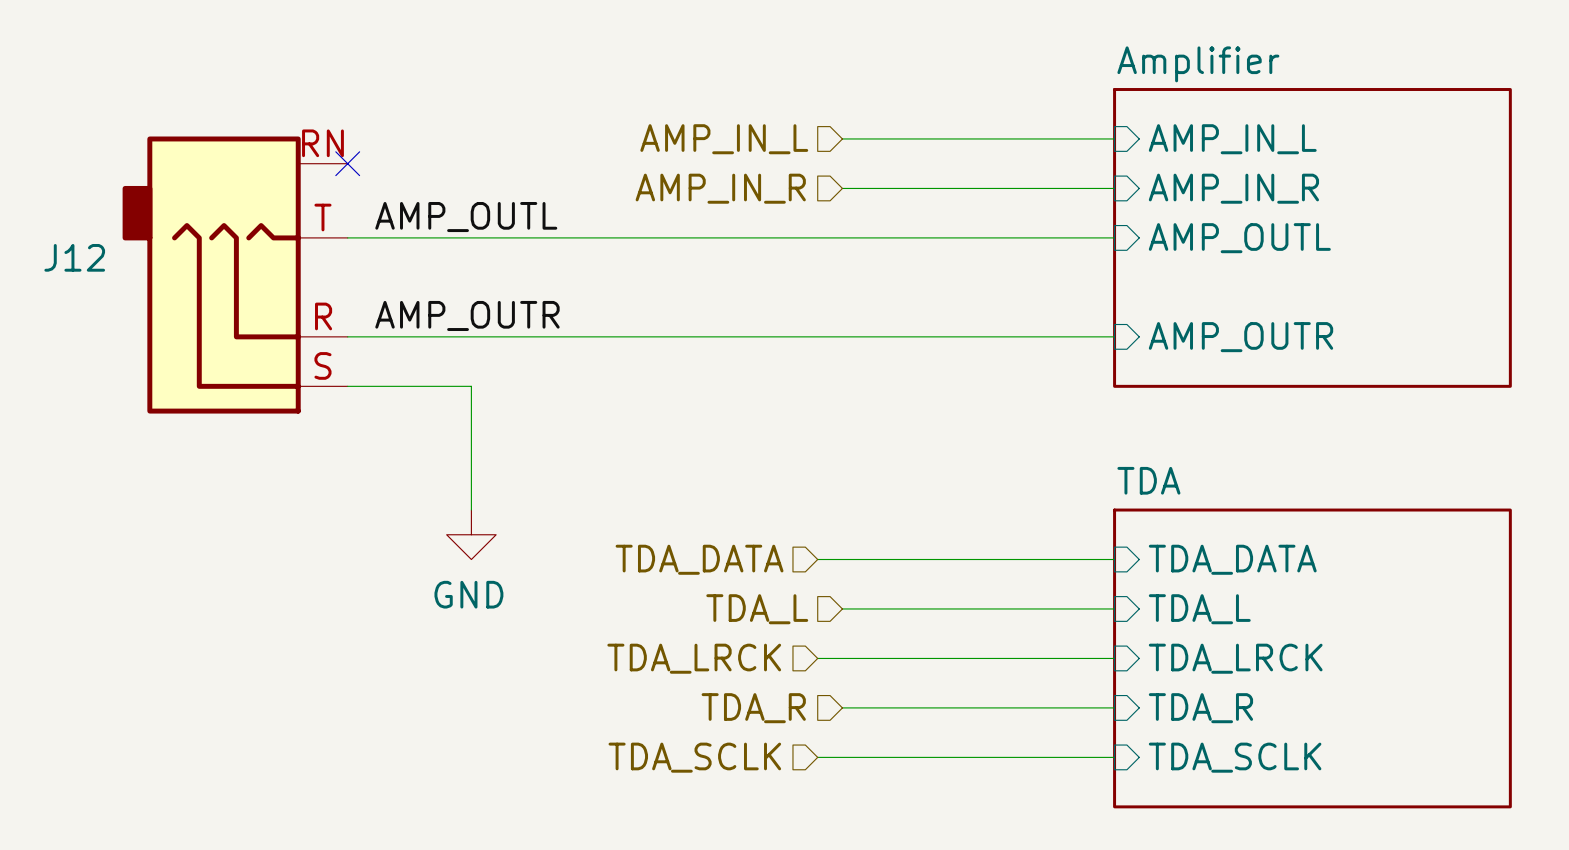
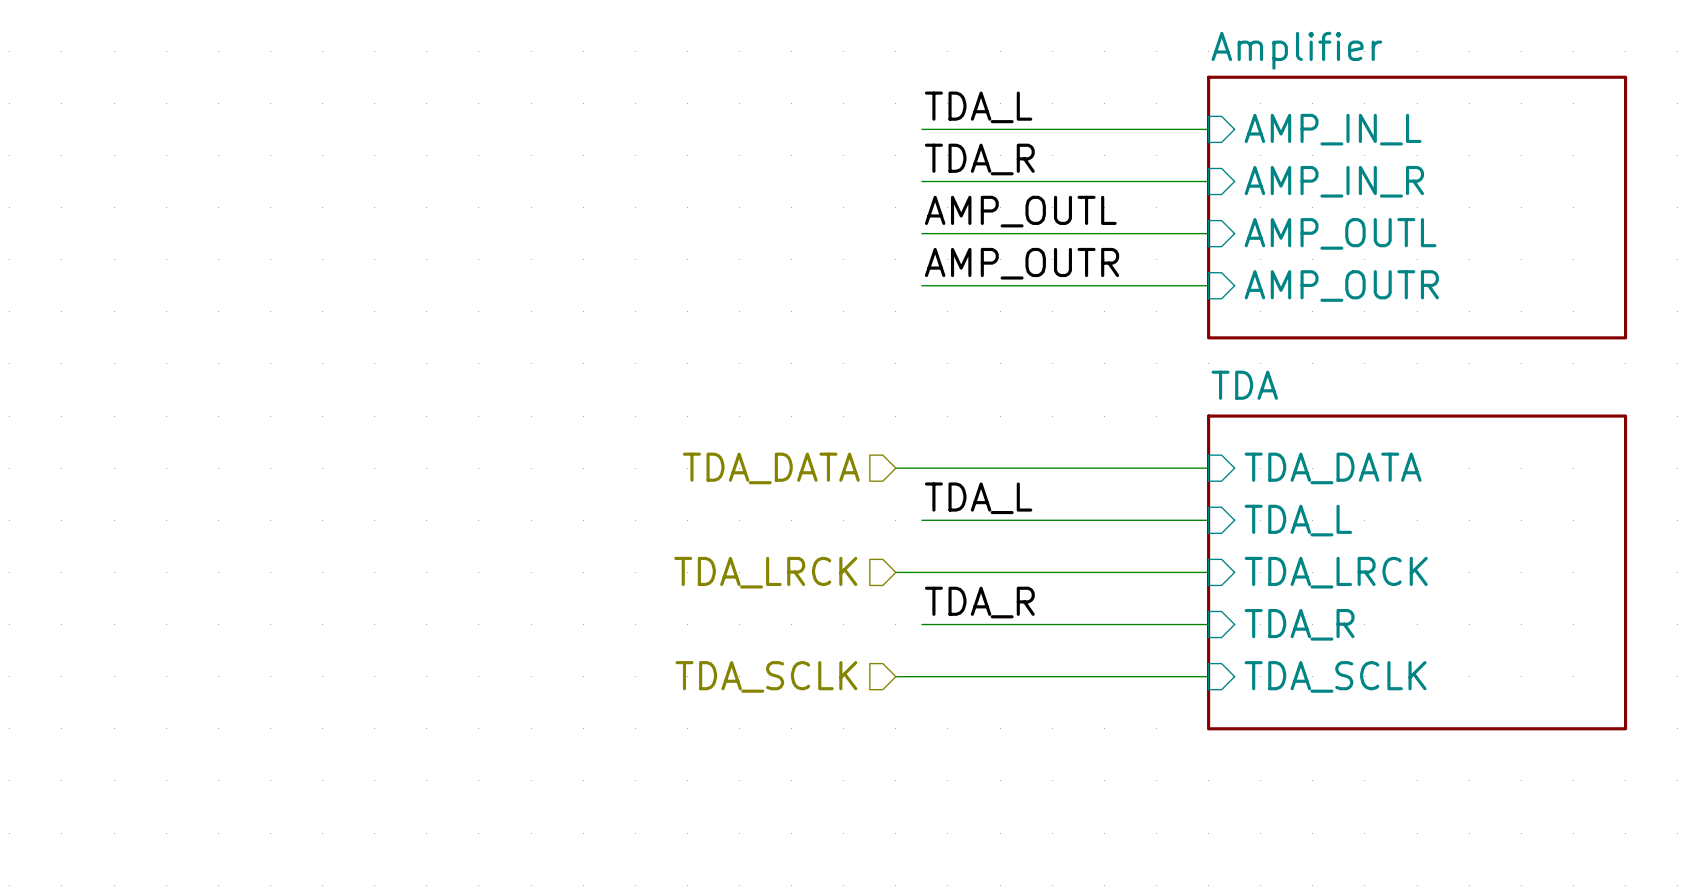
label: none -> TDA_L (978, 107)
hierarchical label: AMP_IN_L (724, 139) -> none
no-connect mark: (347, 163) -> none
label: none -> TDA_R (979, 159)
hierarchical label: AMP_IN_R (720, 188) -> none
sheet Amplifier: none -> (1417, 207)
label position: AMP_OUTL (466, 217) -> AMP_OUTL (1020, 211)
wire: (347, 237) (842, 237) -> none
sheet Amplifier: (1312, 237) -> none
J12: (235, 275) -> none
wire: none -> (921, 285) (1208, 285)
label position: AMP_OUTR (467, 315) -> AMP_OUTR (1022, 263)
wire: (347, 336) (1114, 336) -> none
sheet pin position: AMP_OUTR (1240, 337) -> AMP_OUTR (1341, 286)
wire: (347, 386) (471, 386) (471, 510) -> none
hierarchical label: none -> TDA_DATA (771, 468)
sheet pin: none -> TDA_DATA (1333, 468)
label: none -> TDA_L (978, 498)
sheet pin: none -> TDA_L (1298, 520)
power symbol: GND (471, 534) -> none
hierarchical label: TDA_DATA (699, 559) -> TDA_LRCK (765, 572)
sheet pin: TDA_DATA (1232, 559) -> TDA_LRCK (1336, 572)
label: none -> TDA_R (979, 602)
hierarchical label: TDA_L (757, 609) -> none
sheet pin: TDA_L (1199, 609) -> TDA_R (1299, 624)
hierarchical label: TDA_LRCK (694, 658) -> TDA_SCLK (766, 676)
sheet pin: TDA_LRCK (1235, 658) -> TDA_SCLK (1335, 676)
sheet TDA position: (1312, 658) -> (1417, 572)
wire: (842, 707) (1114, 707) -> (921, 520) (1208, 520)
hierarchical label: TDA_R (753, 708) -> none
sheet pin: TDA_R (1200, 708) -> none
hierarchical label: TDA_SCLK (694, 757) -> none
wire: (817, 757) (1114, 757) -> (895, 468) (1208, 468)
sheet pin: TDA_SCLK (1235, 757) -> none

